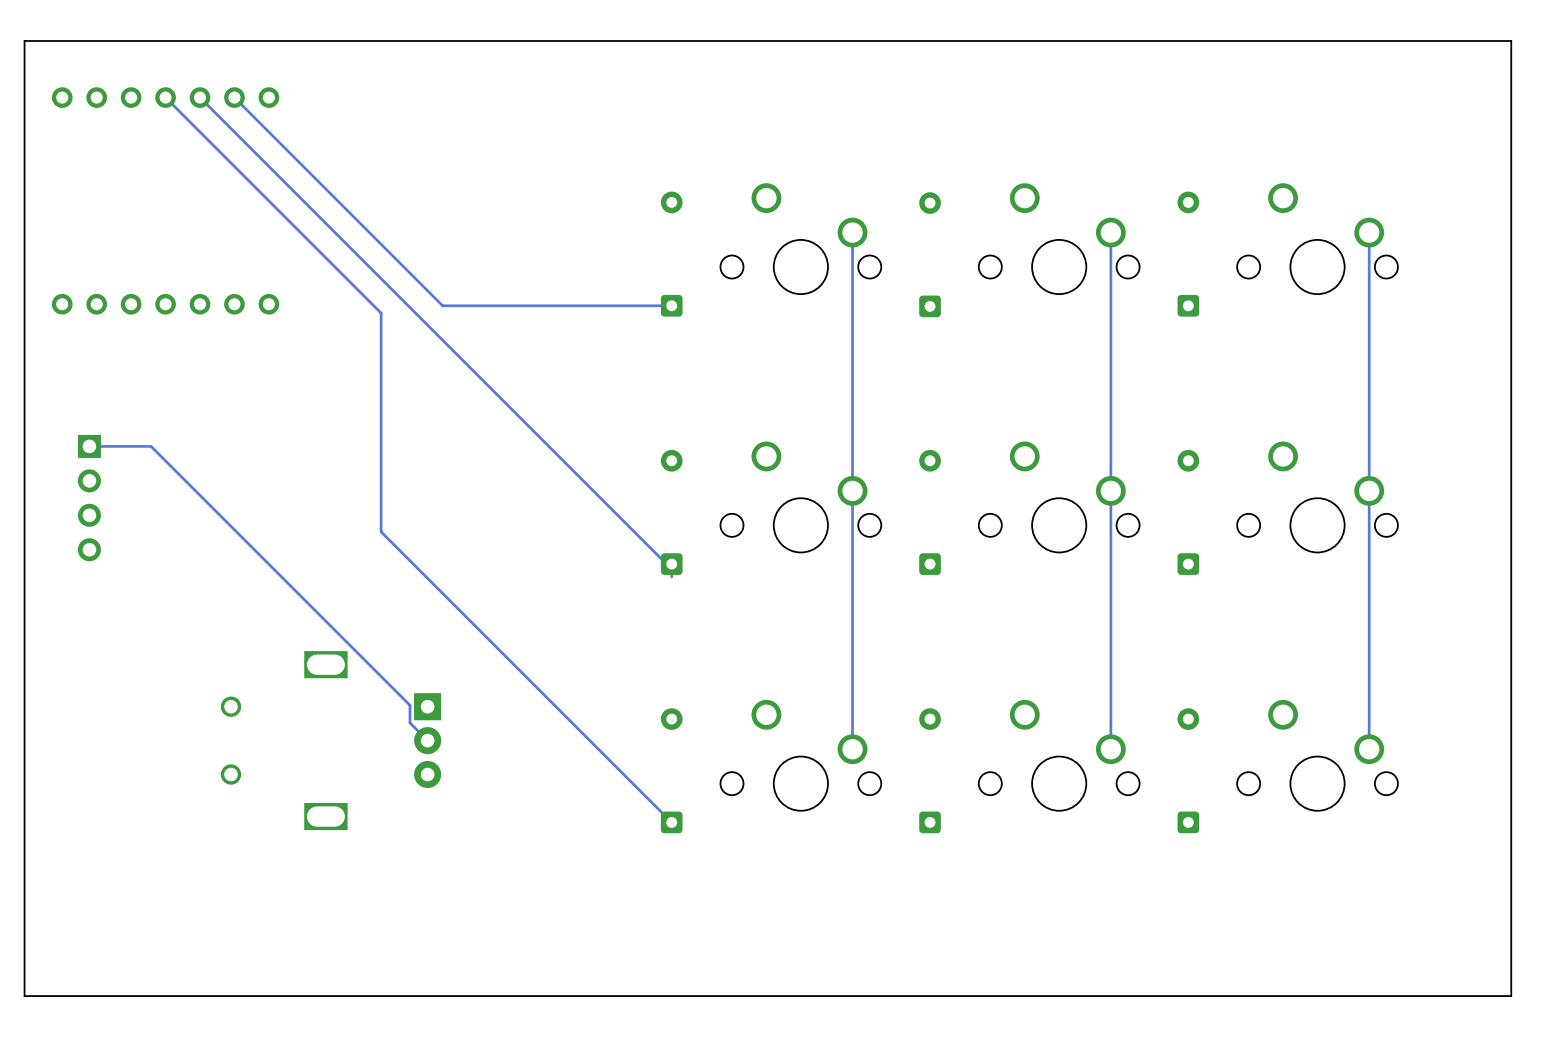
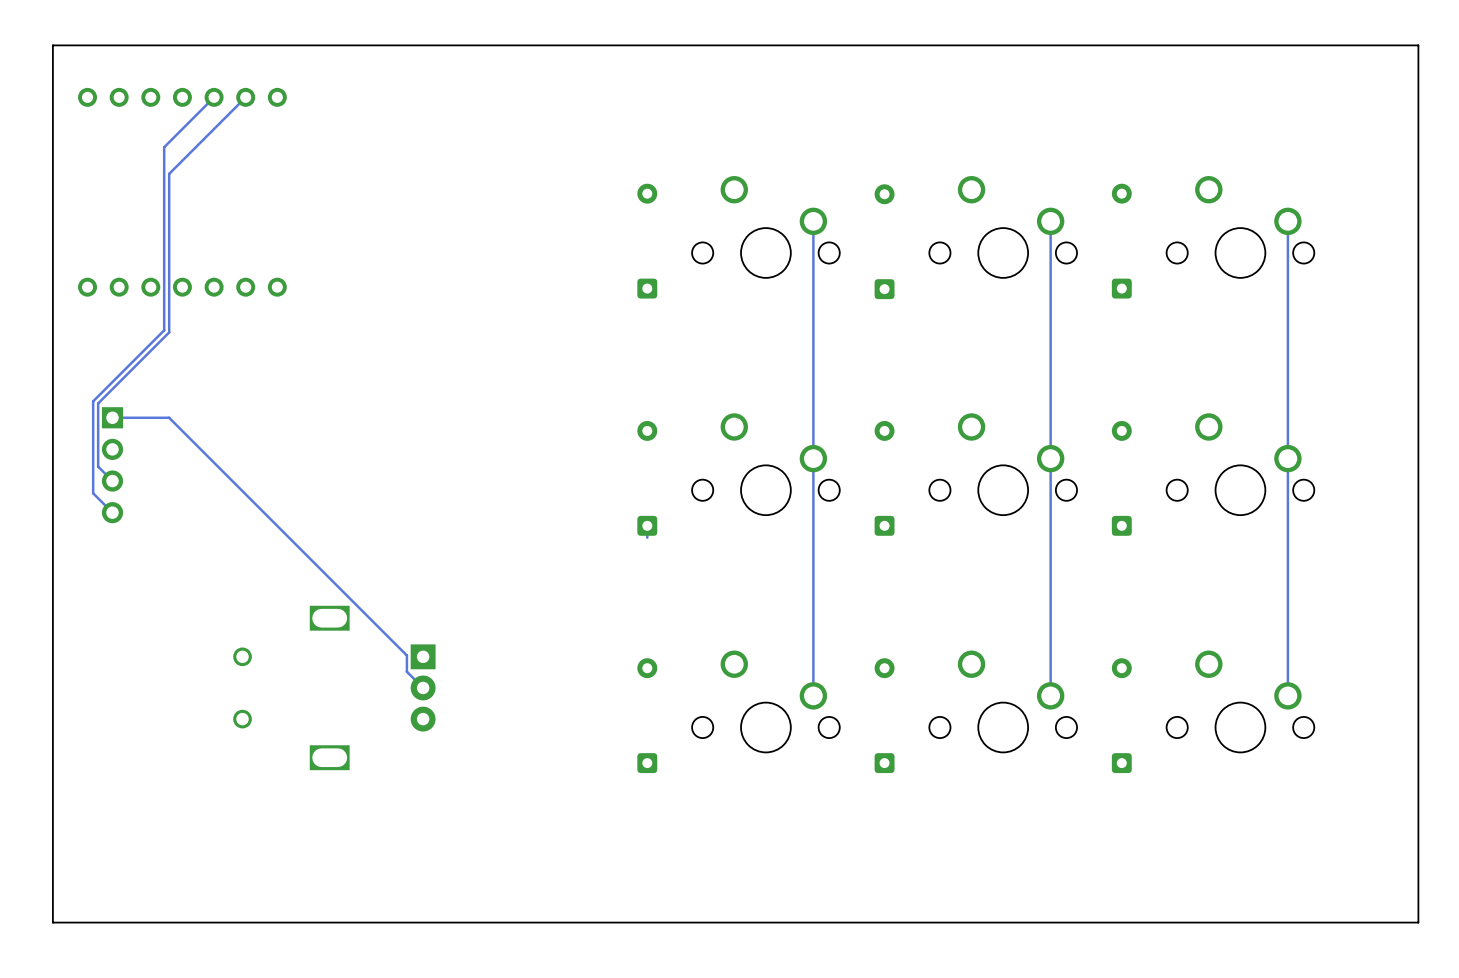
track: (165, 97) (381, 313) (381, 531) (671, 822) -> none
track: (200, 97) (671, 569) -> (214, 97) (164, 147) (164, 330) (93, 401) (93, 493) (112, 512)
track: (234, 97) (442, 305) (671, 305) -> (245, 97) (169, 173) (169, 332) (98, 403) (98, 466) (112, 481)

